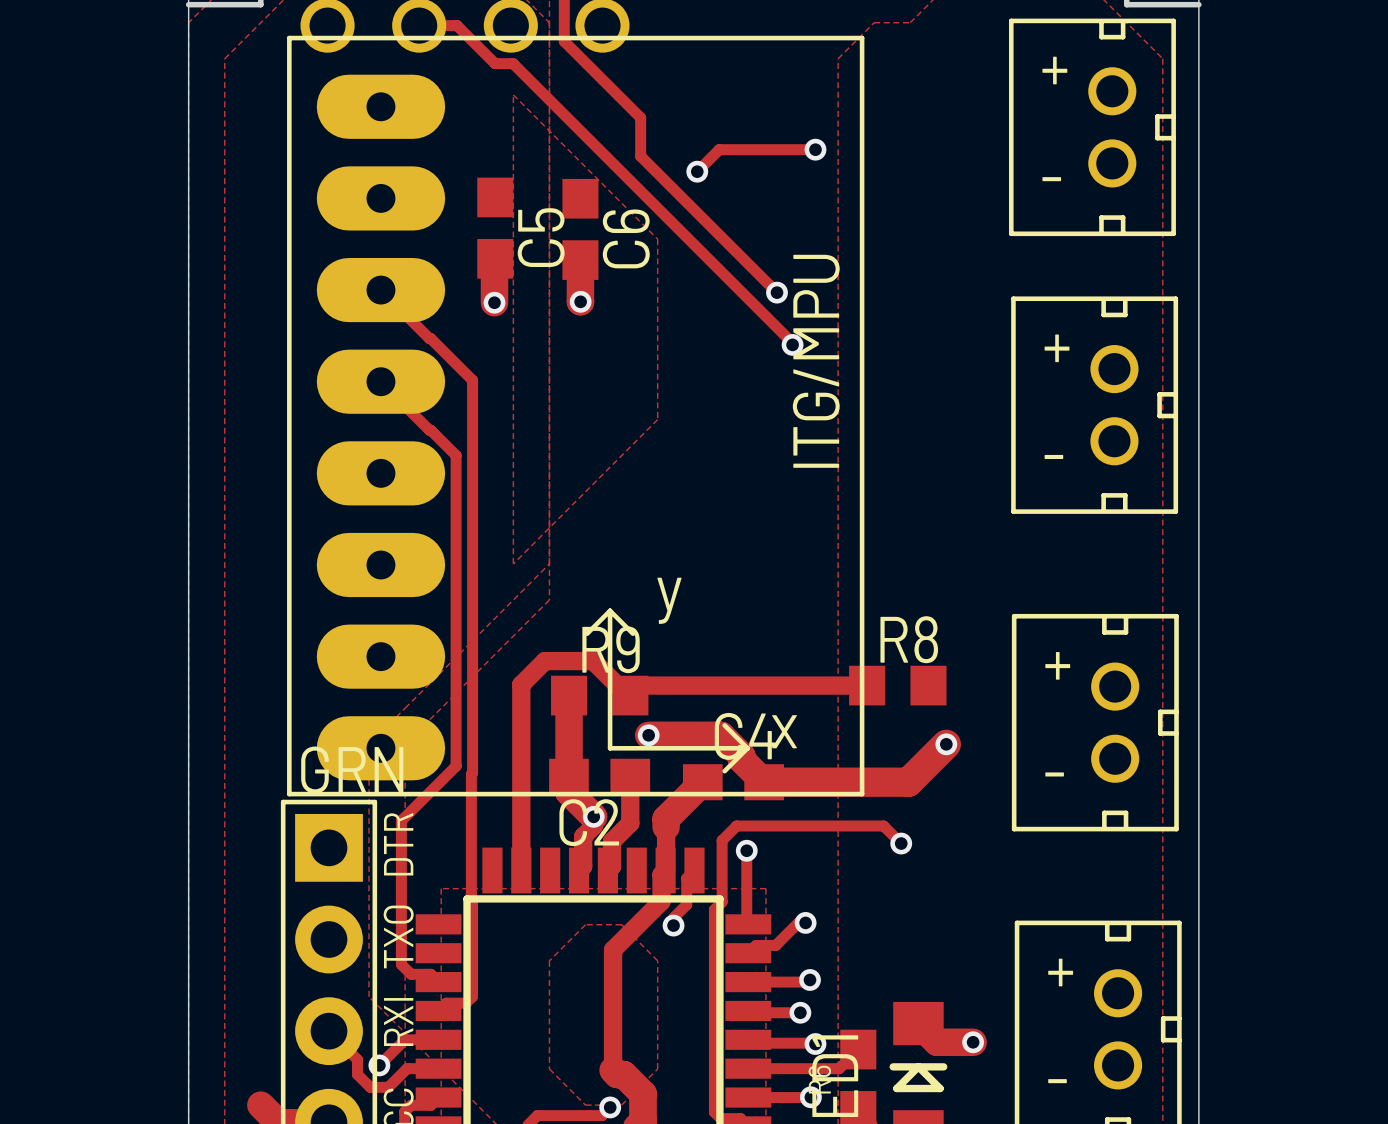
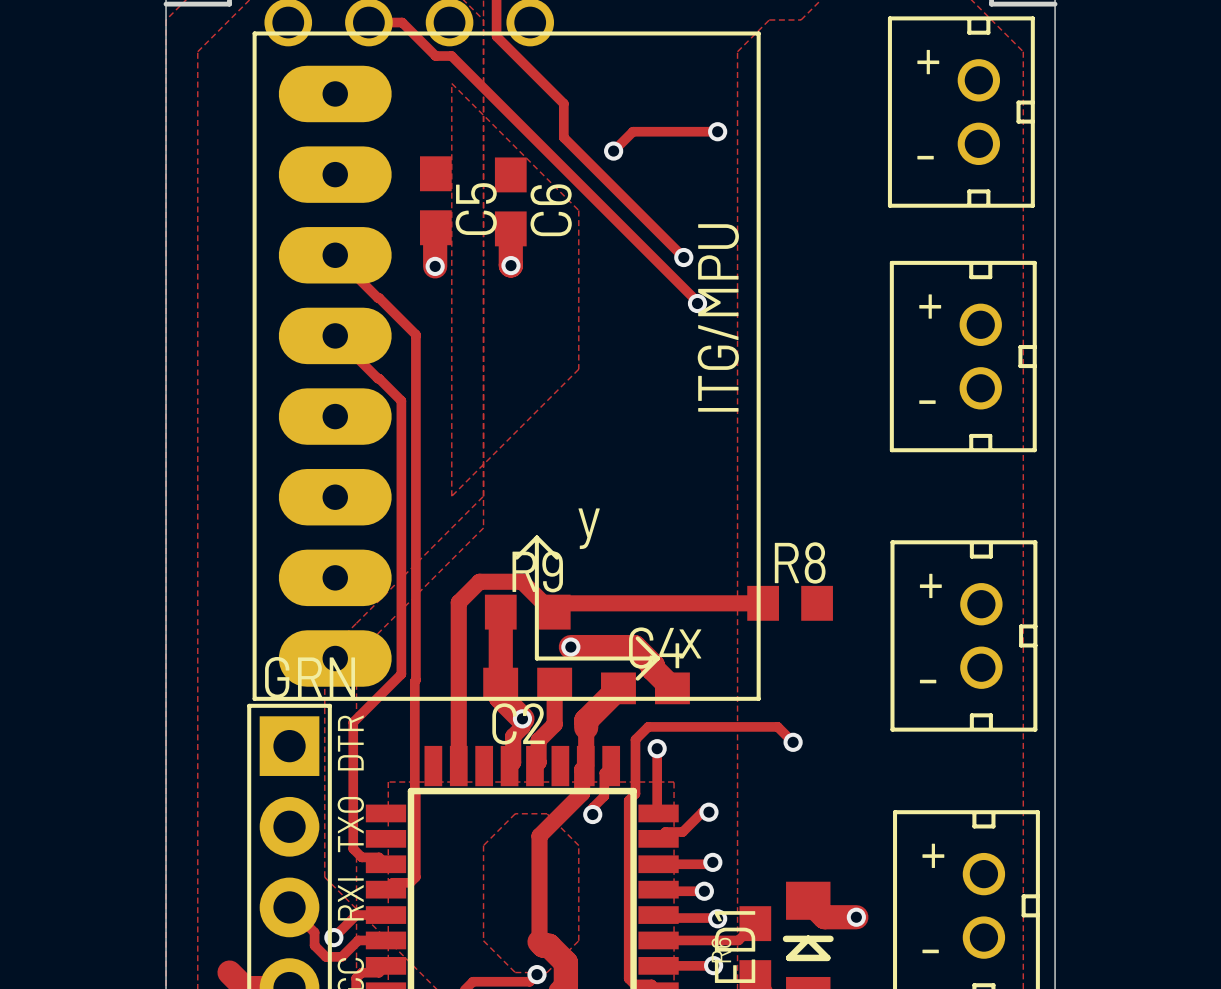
track: (946, 744) (908, 782) (764, 782) -> none
via: (946, 744) -> none

